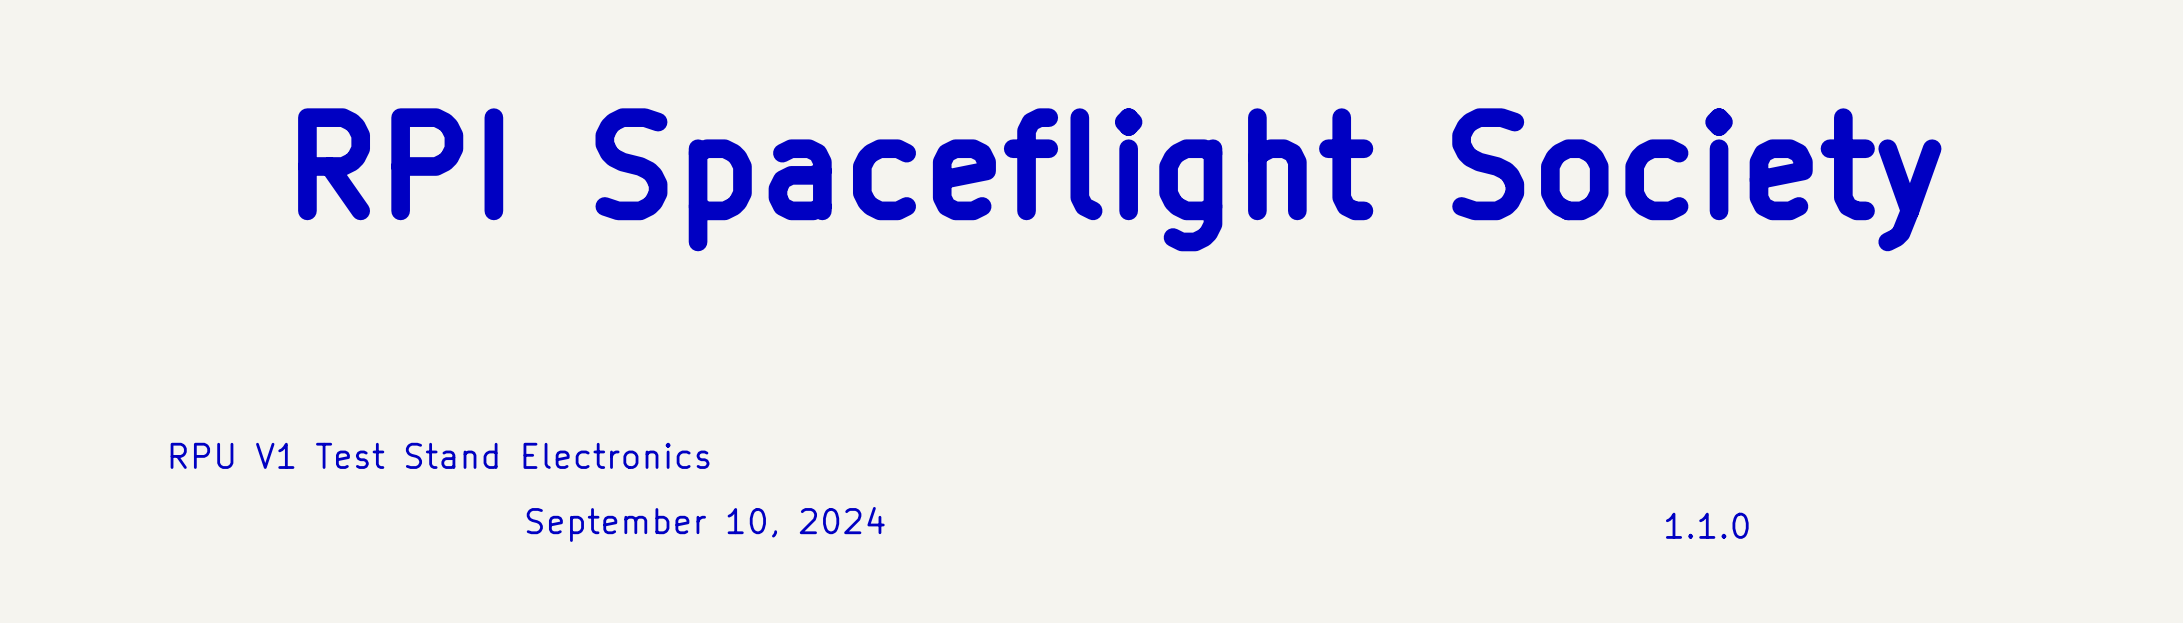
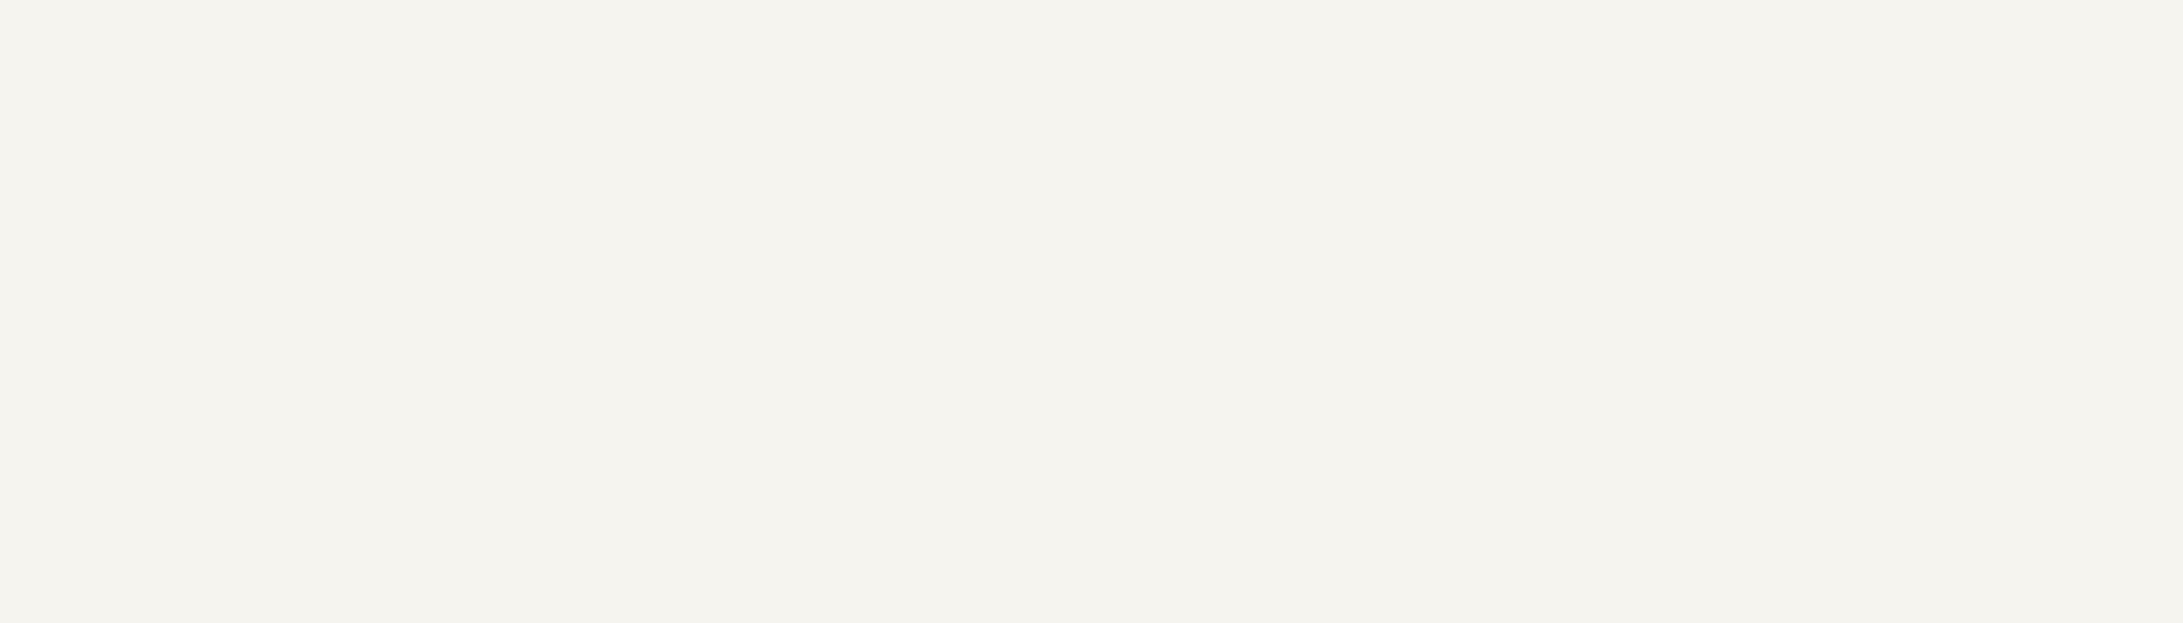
text: RPI Spaceflight Society (1119, 179) -> none
text: RPU V1 Test Stand Electronics (440, 455) -> none
text: September 10, 2024 (705, 524) -> none
text: 1.1.0 (1707, 525) -> none

